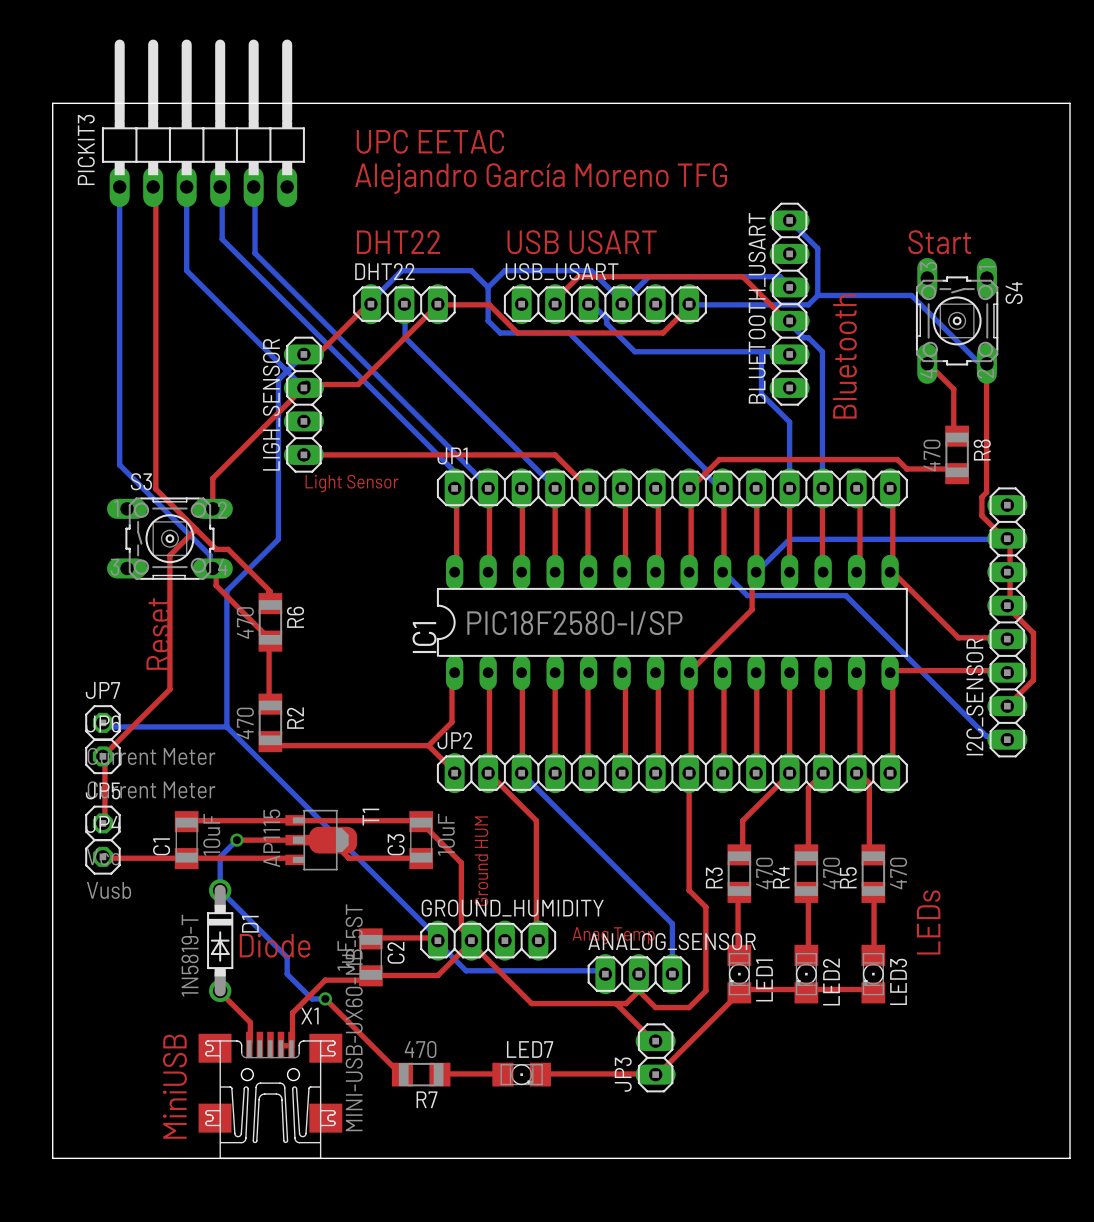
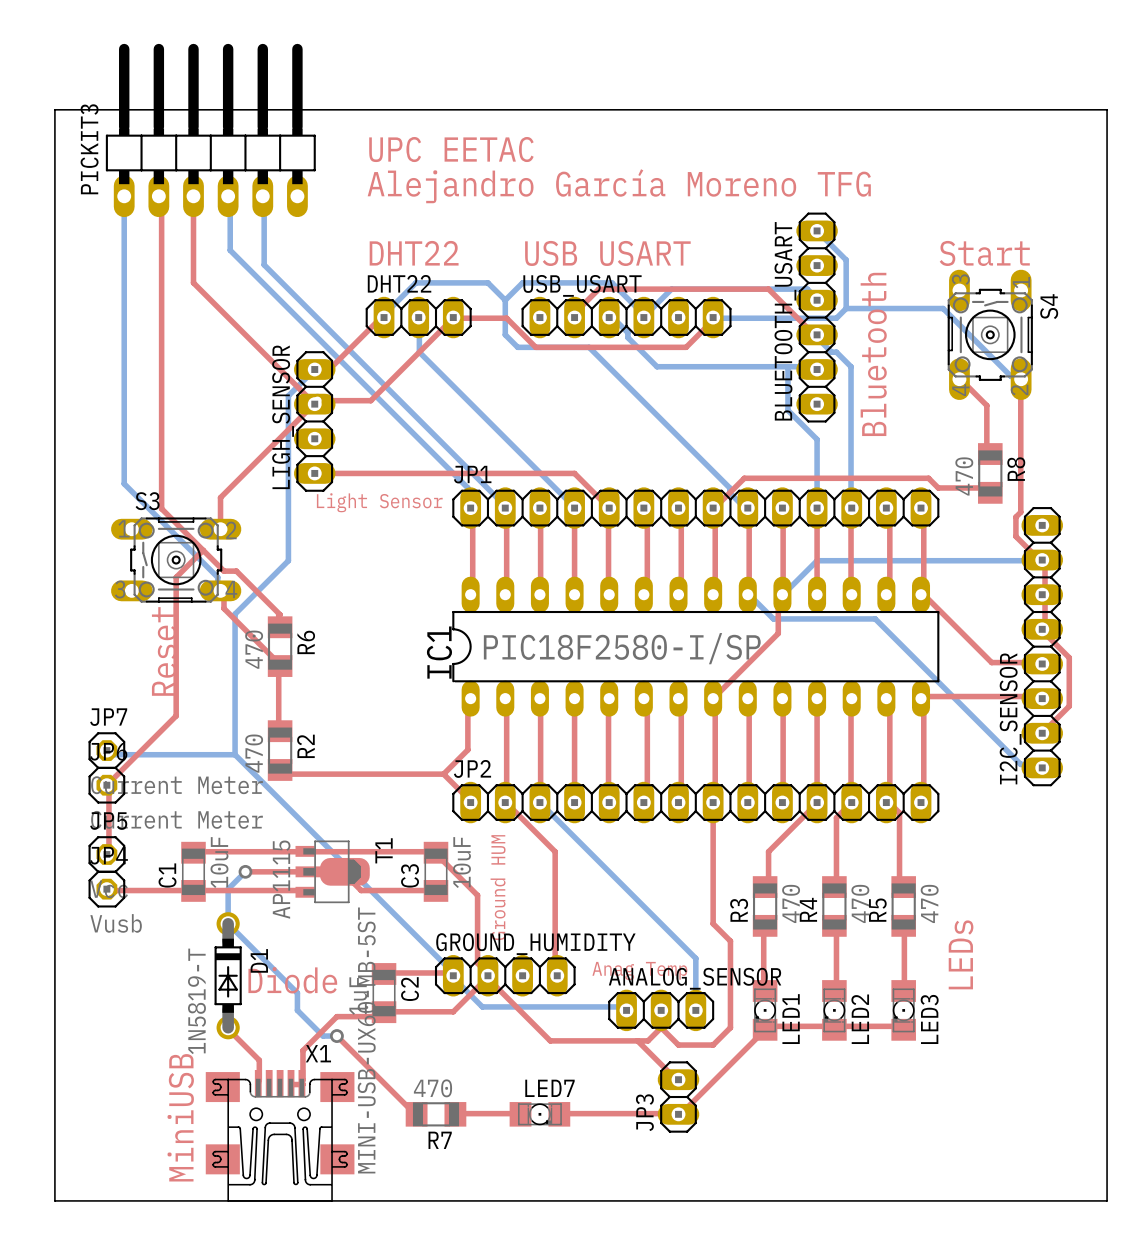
top track: none -> (193, 196) (193, 282) (311, 400) (317, 400)
bottom track: (186, 186) (186, 270) (300, 384) (306, 384) -> none

